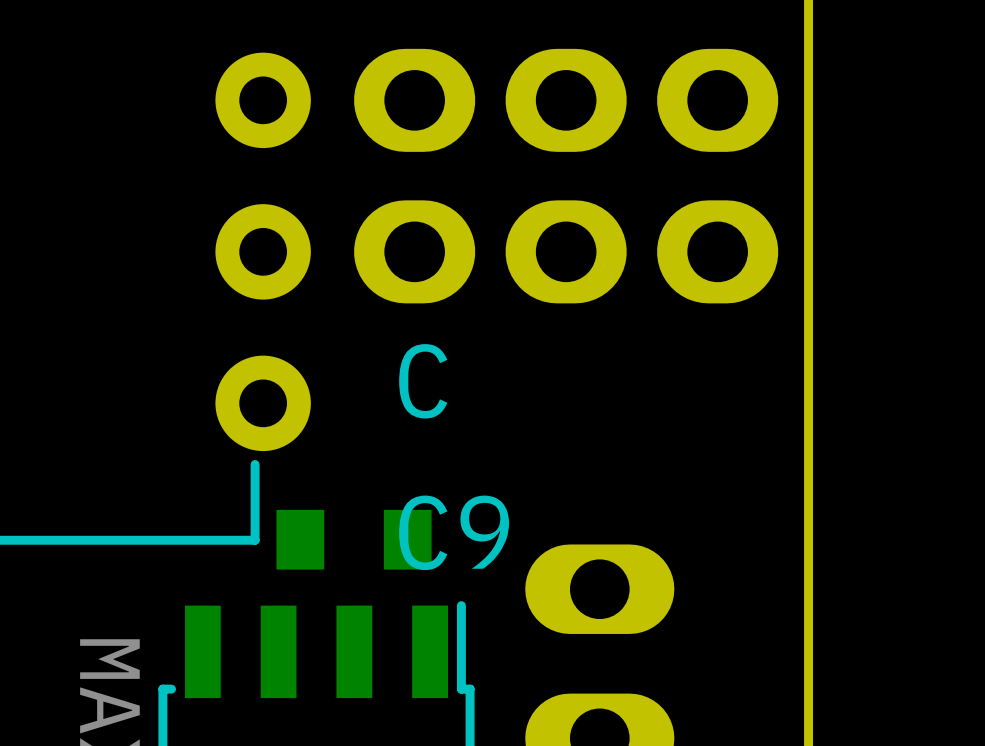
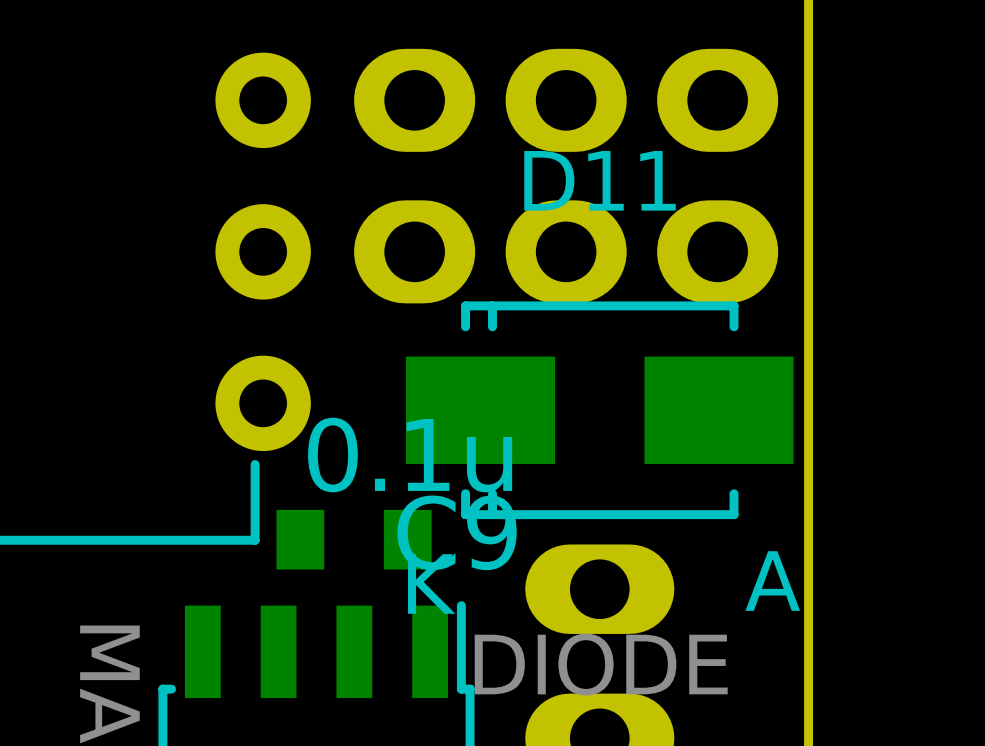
C9 value: C (423, 381) -> 0.1u (410, 455)
D11: none -> DIODE (599, 410)

